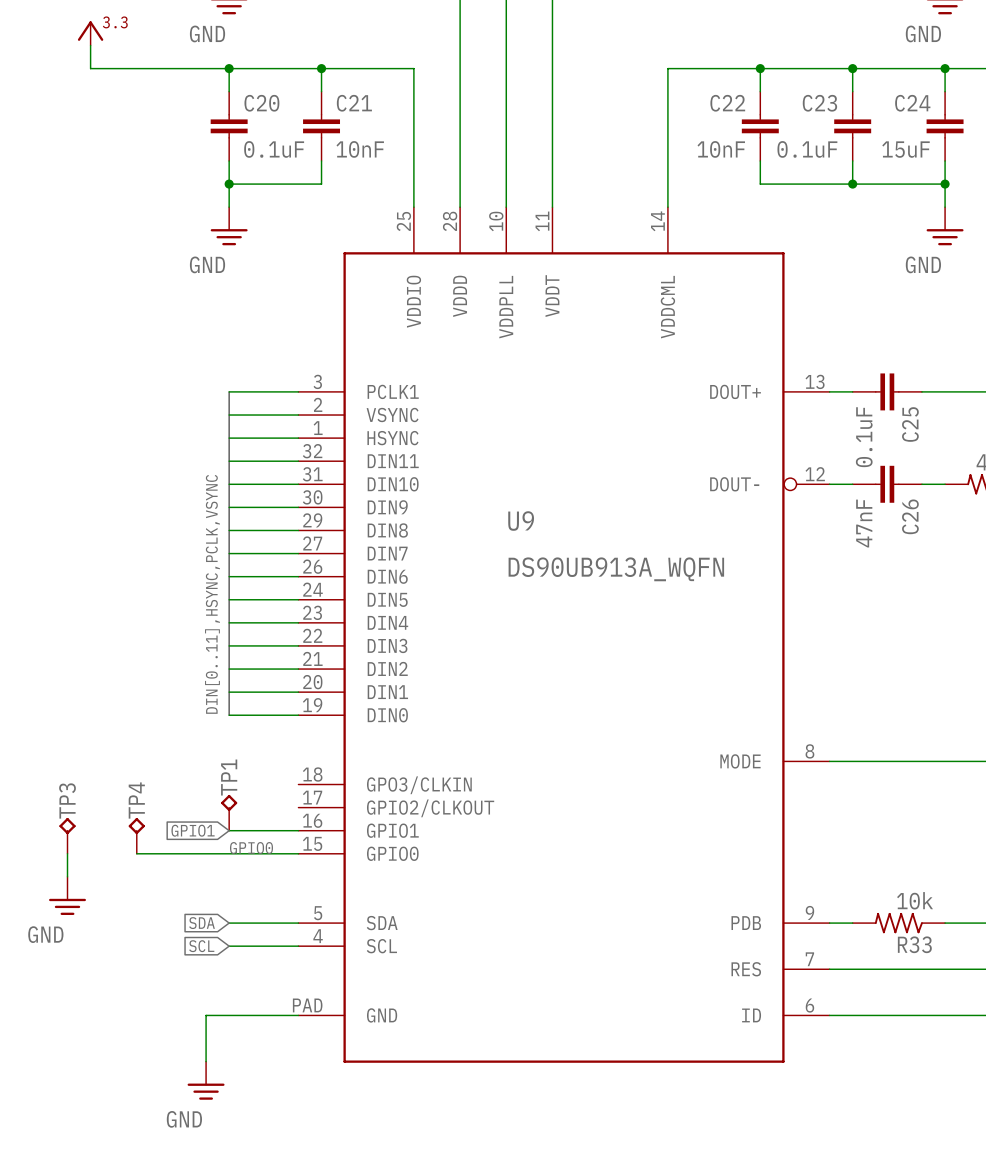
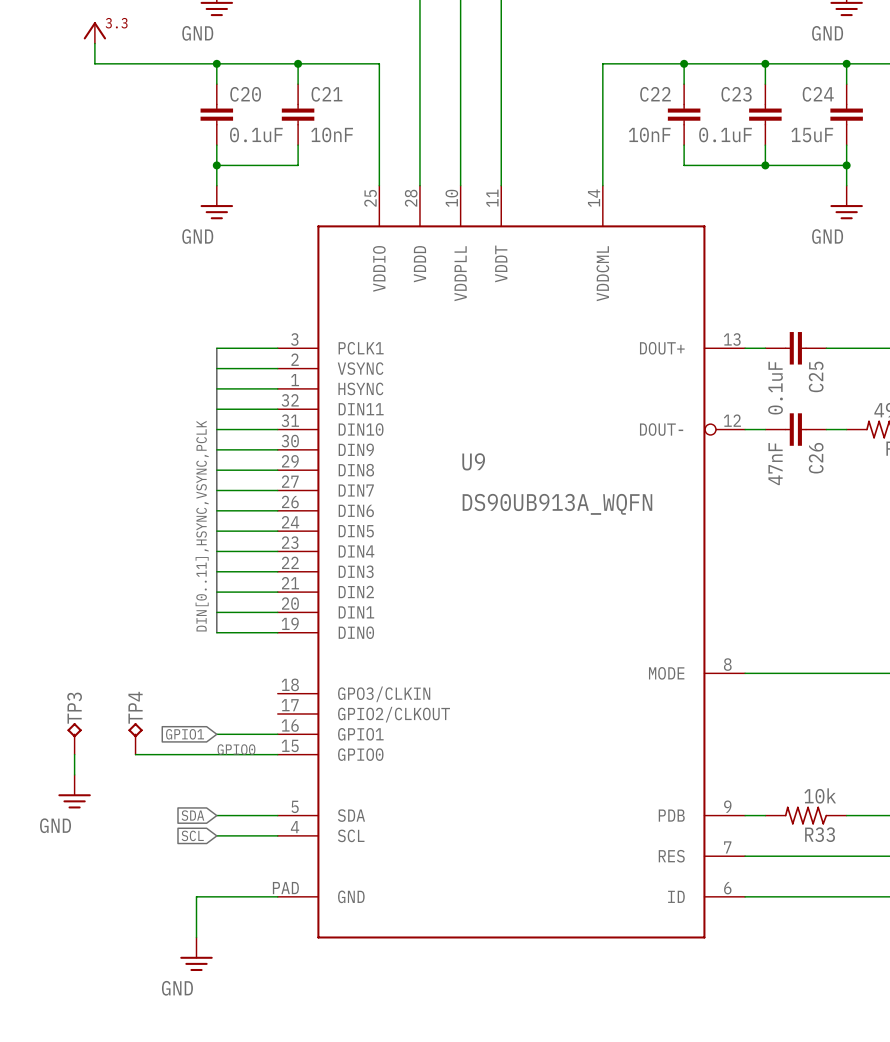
label: DIN[0..11],HSYNC,PCLK,VSYNC (212, 594) -> DIN[0..11],HSYNC,VSYNC,PCLK (202, 526)
TP1: (229, 812) -> none

